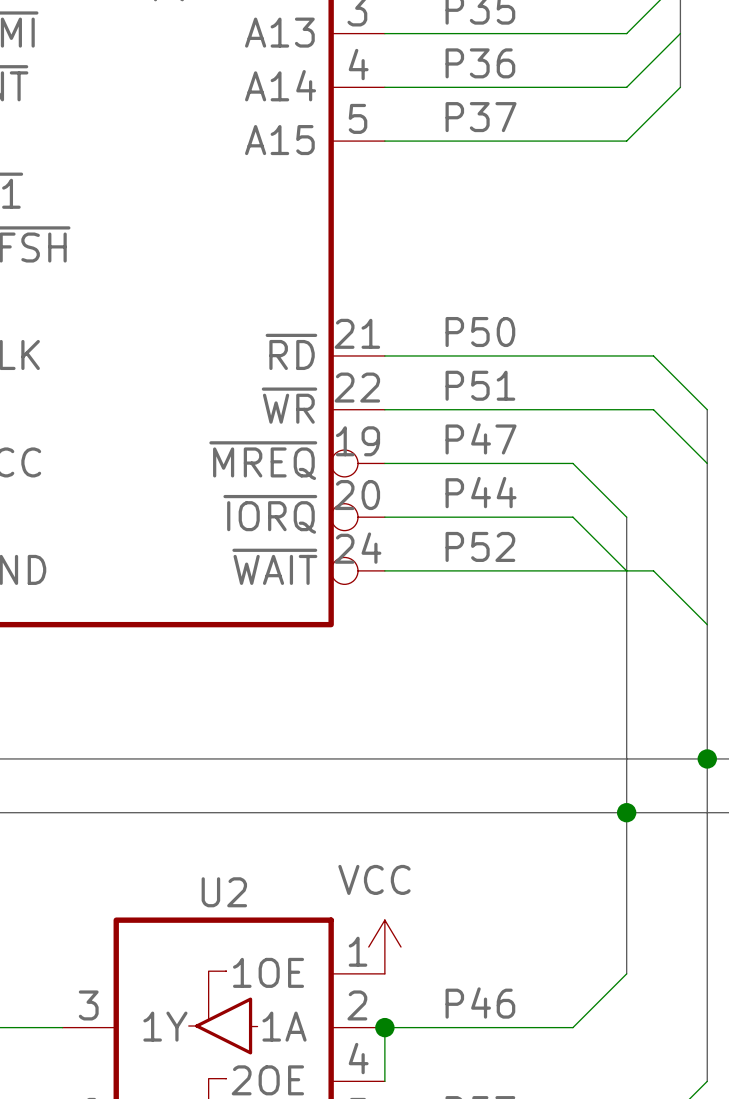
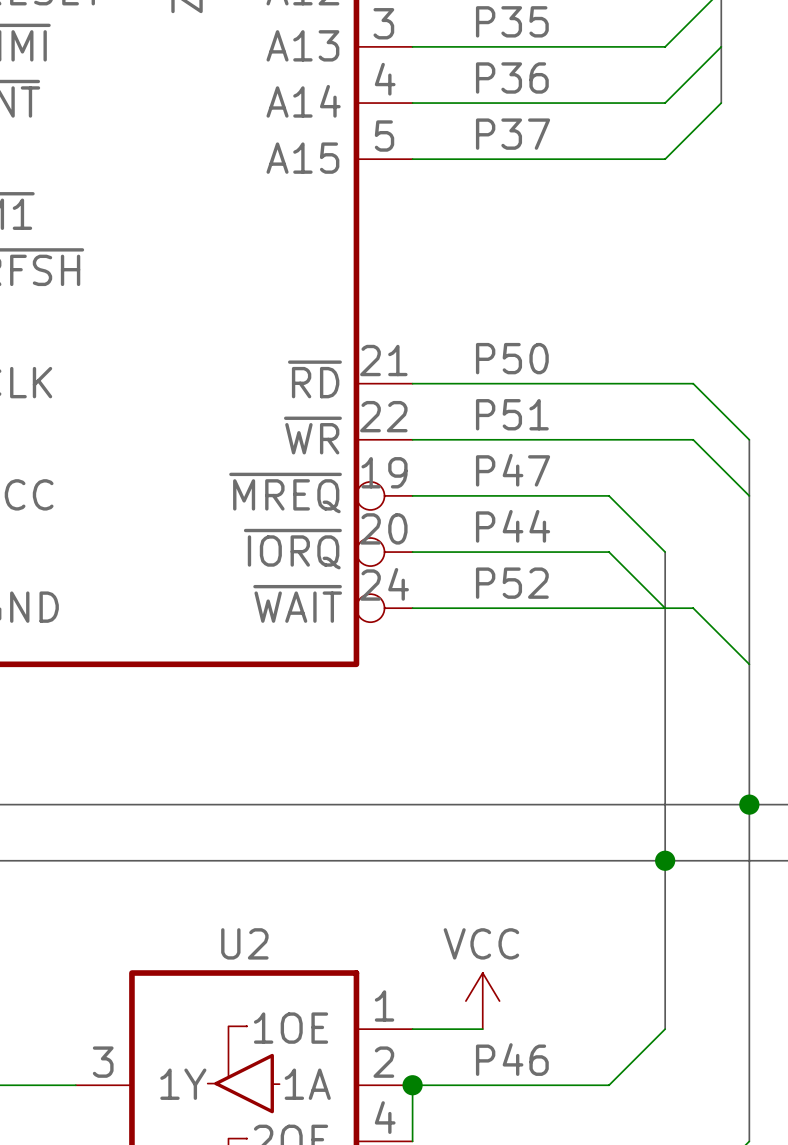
power symbol text position: VCC (374, 879) -> VCC (481, 943)
power symbol position: VCC (384, 947) -> VCC (482, 1001)
wire: none -> (412, 1029) (482, 1029)

